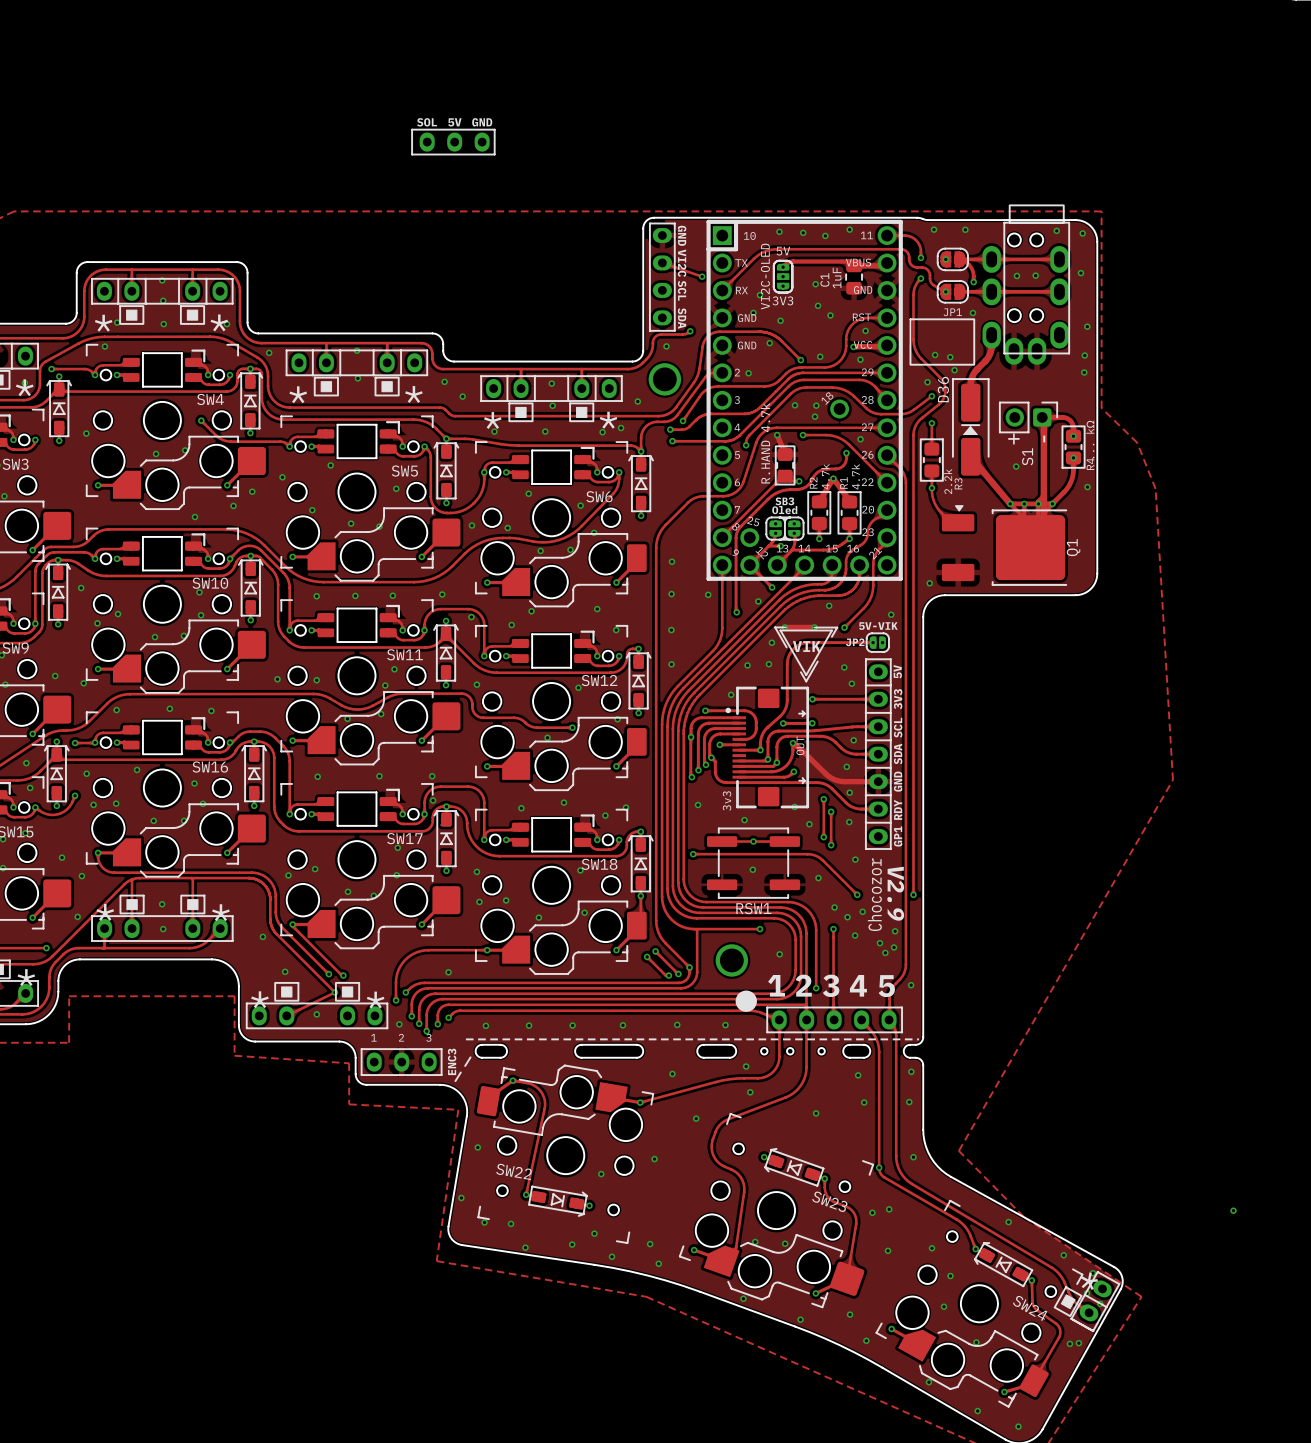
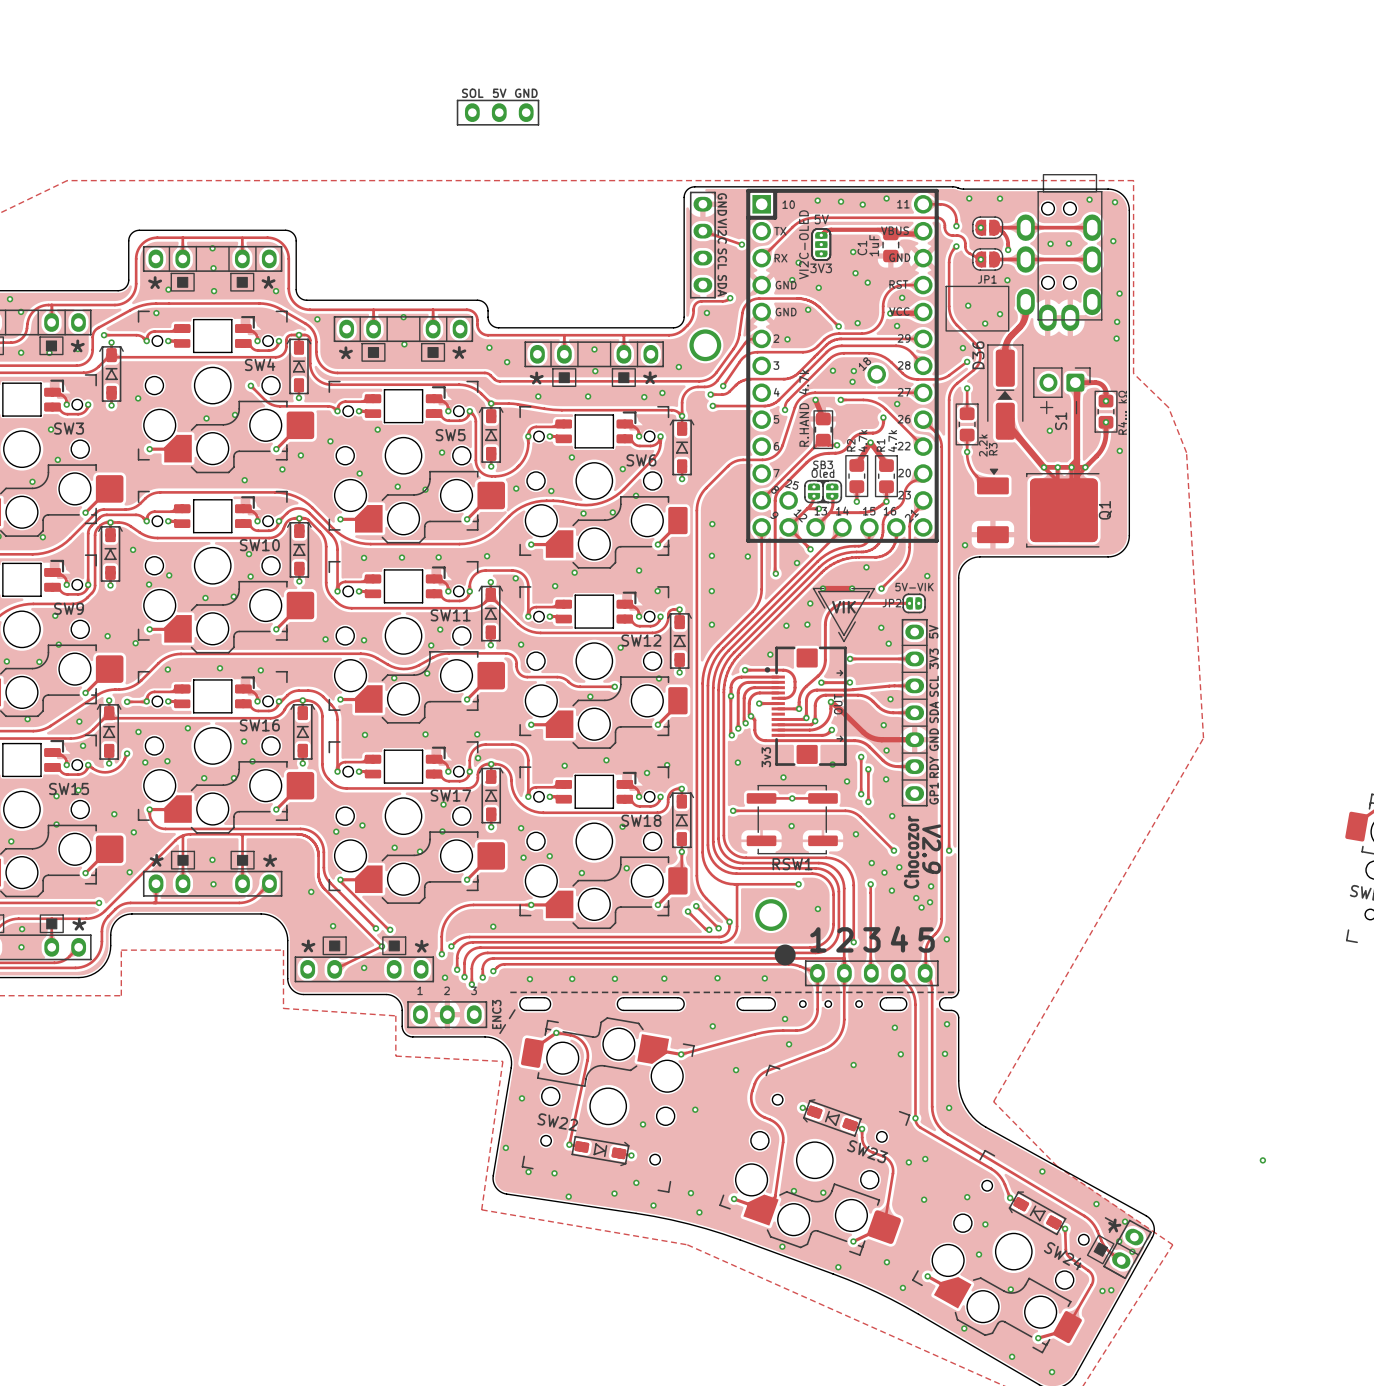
via: none -> (968, 305)
via: none -> (1000, 314)
via: (935, 355) -> none
via: (954, 370) -> none

